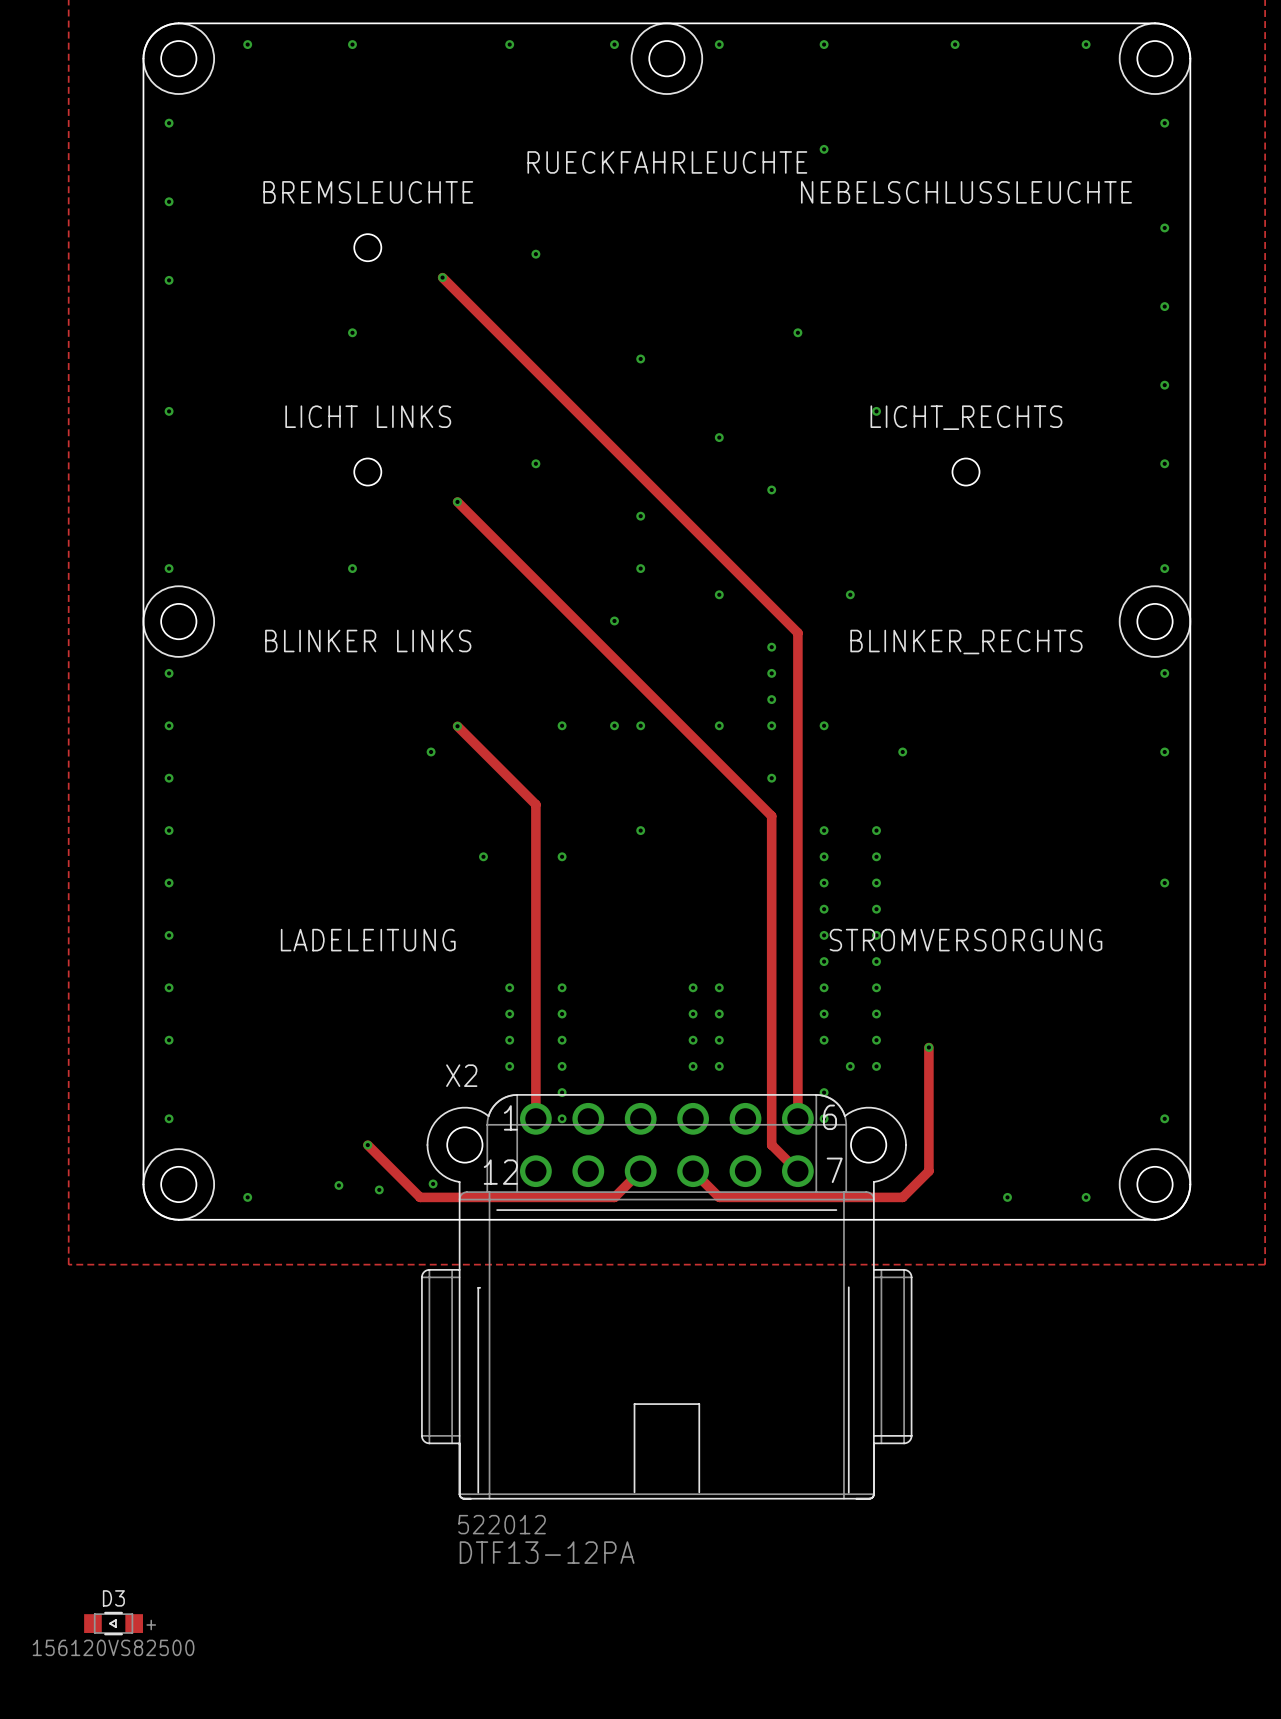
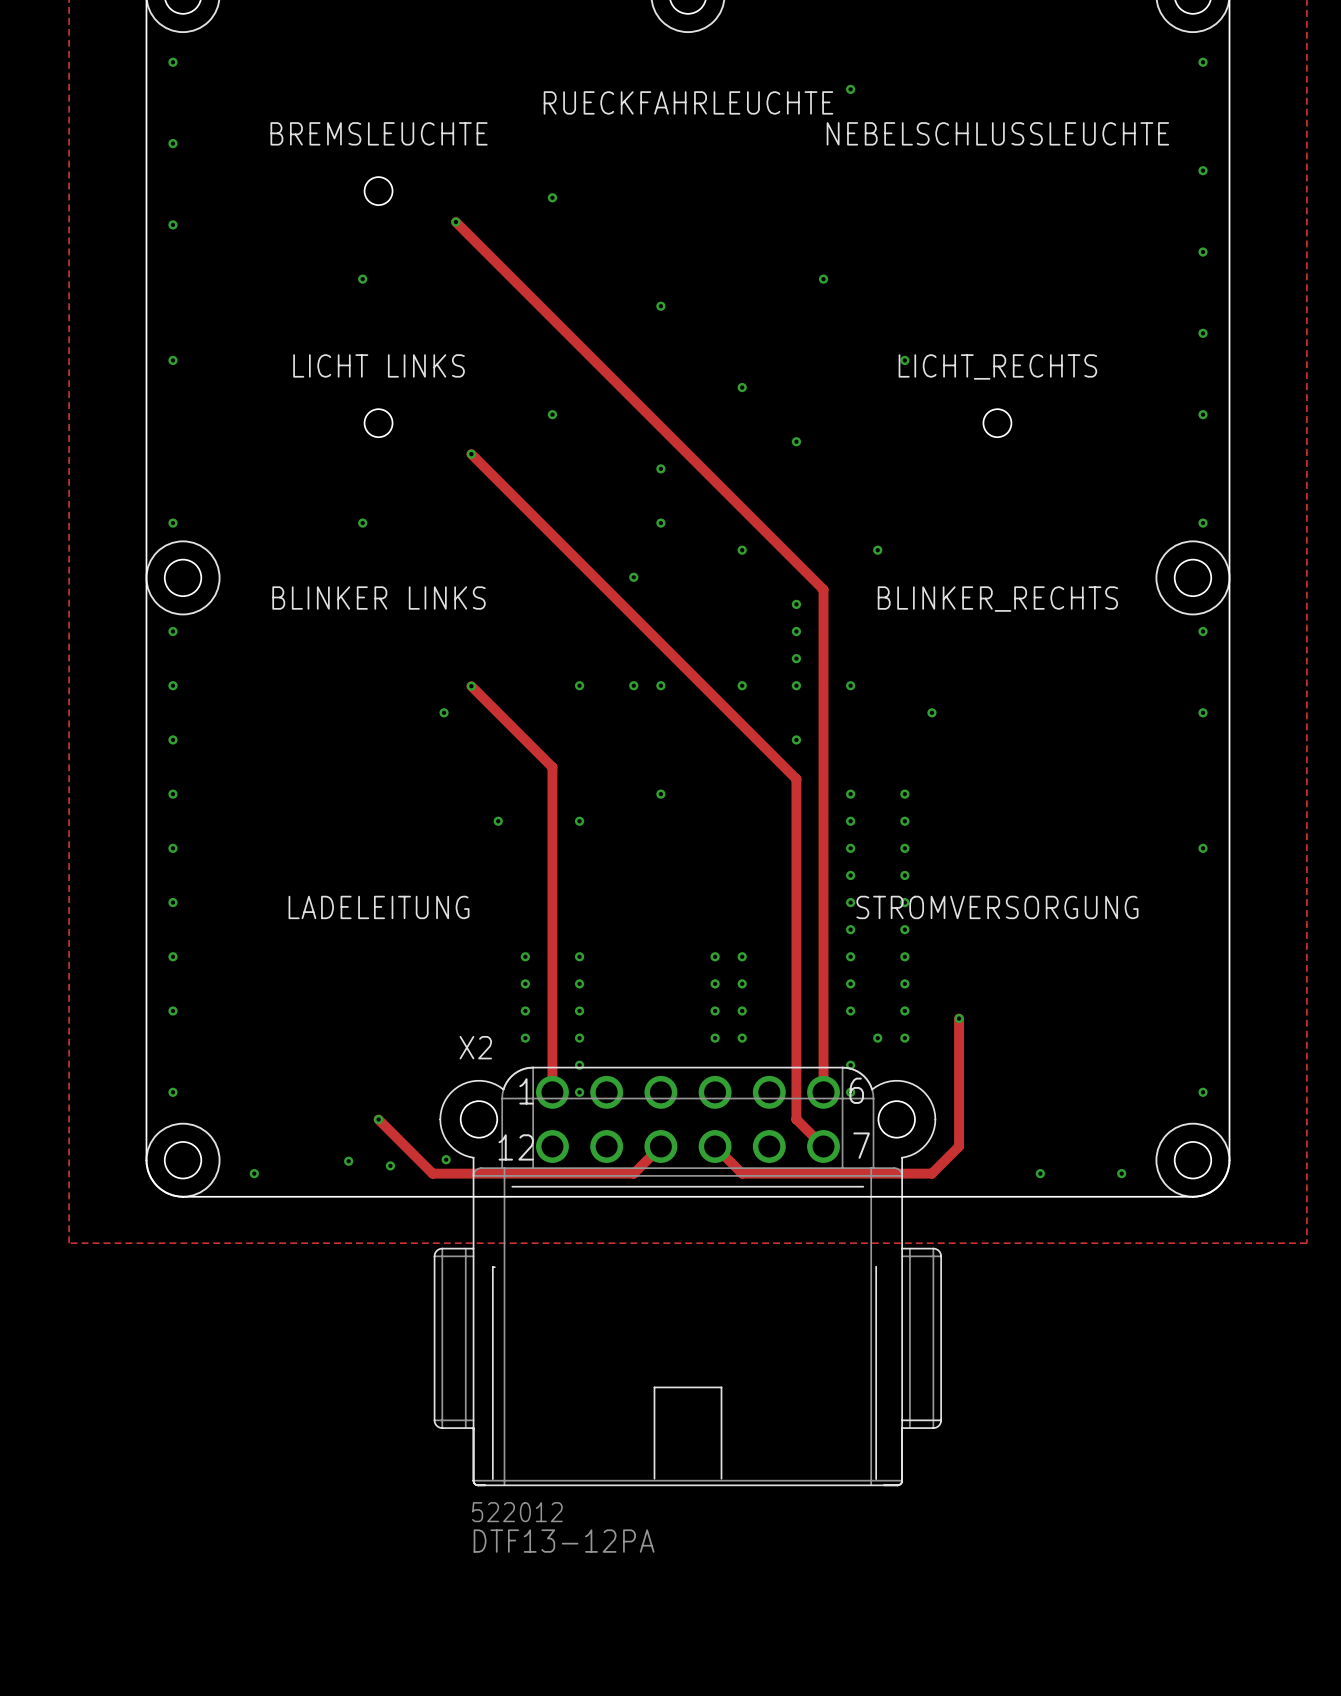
D3: 156120VS82500 (113, 1623) -> none

